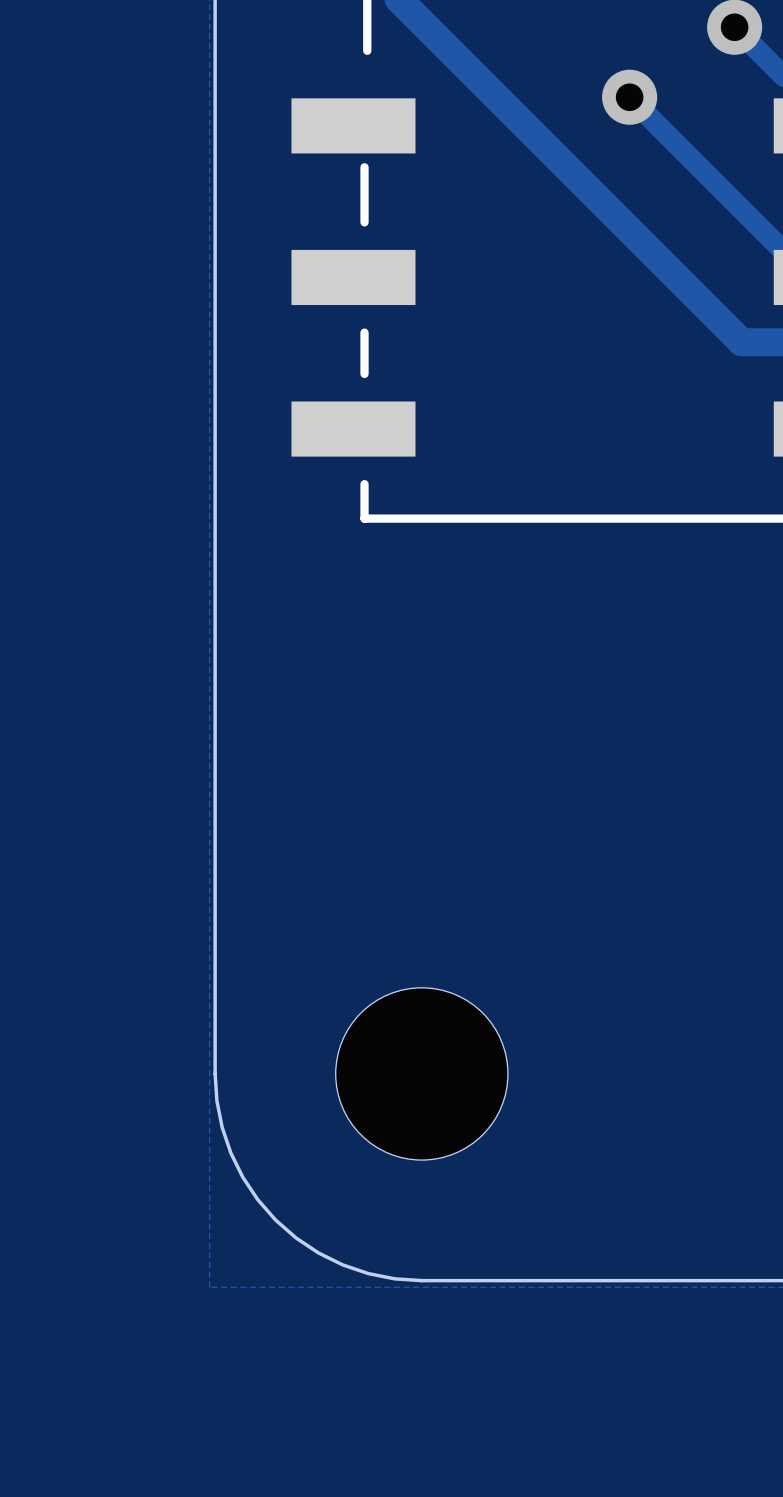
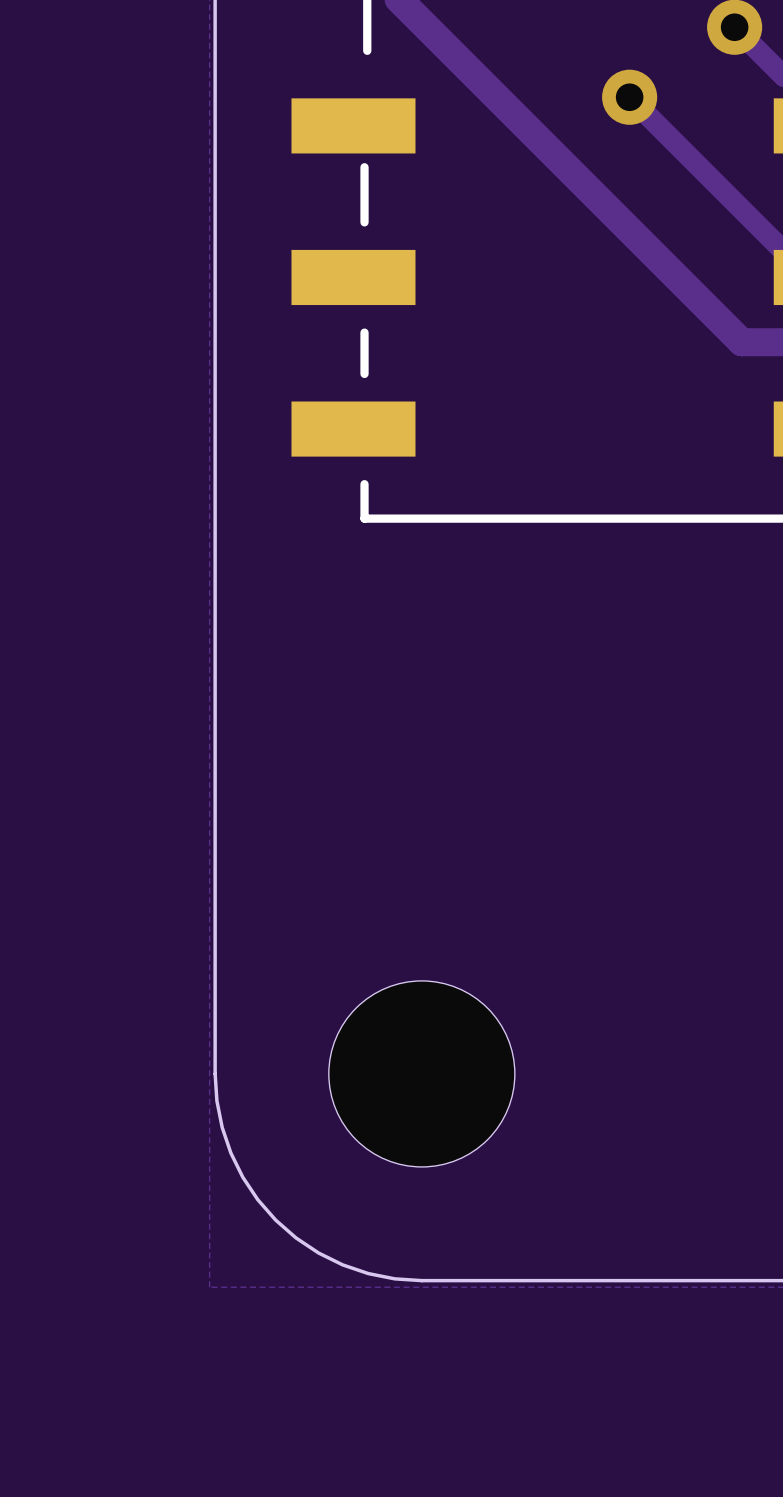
part footprint: [335, 987, 508, 1161] -> [328, 980, 515, 1167]

